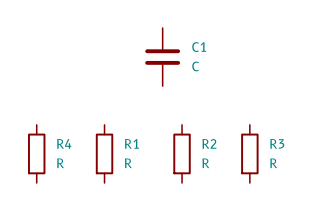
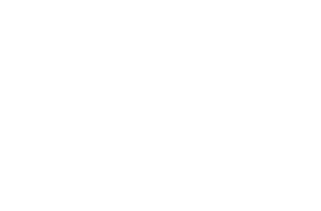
C1: C (162, 57) -> none
R4: R (36, 153) -> none
R1: R (104, 153) -> none
R2: R (182, 153) -> none
R3: R (249, 153) -> none

